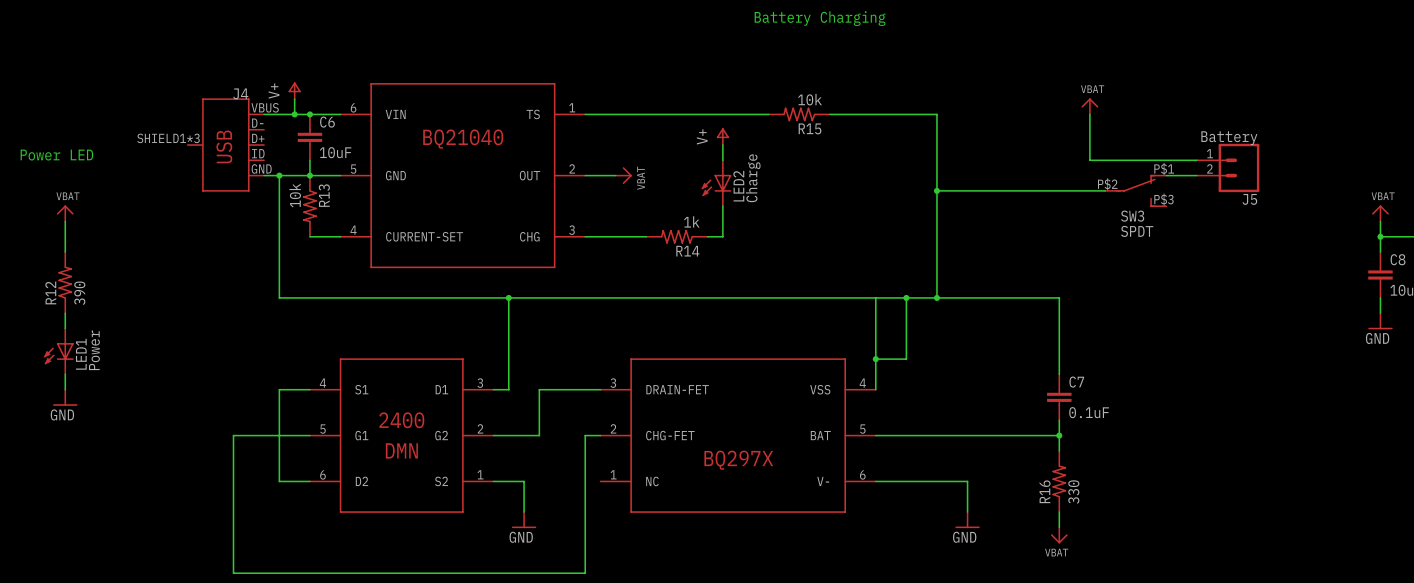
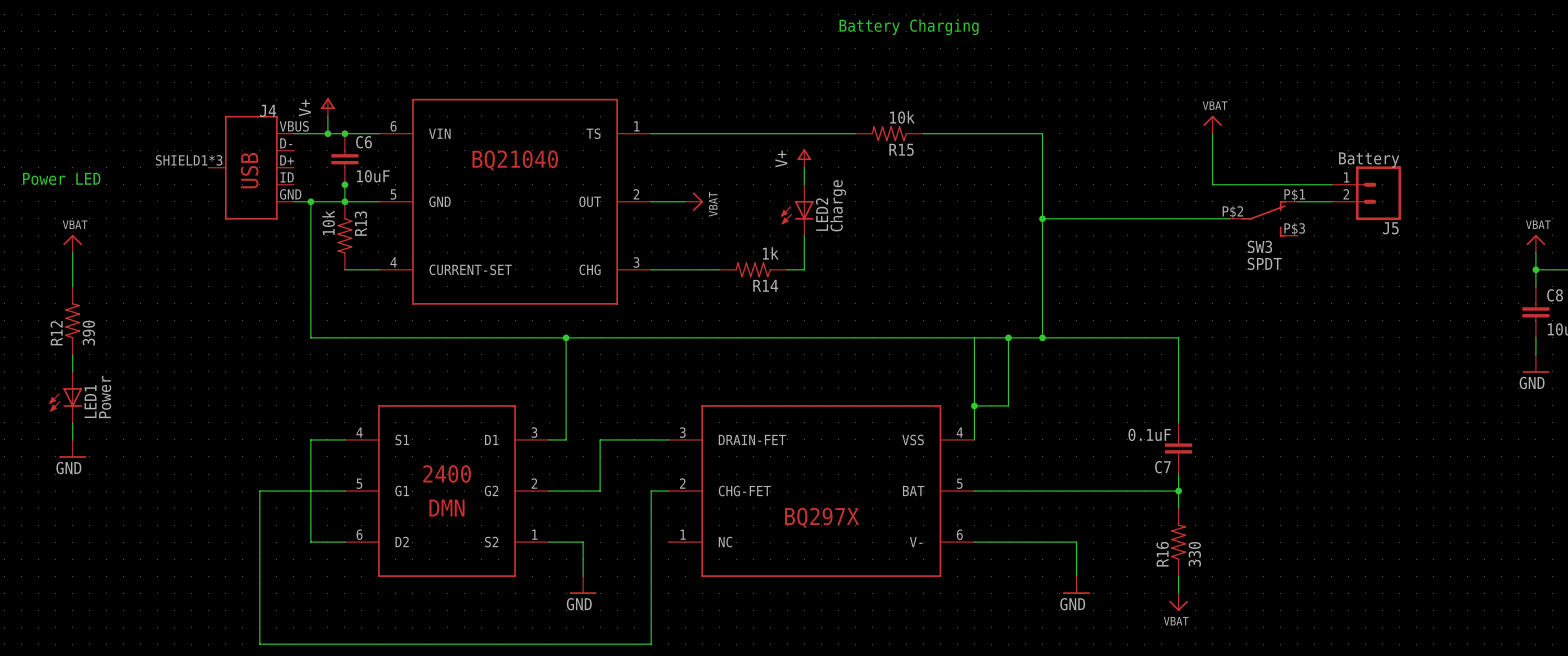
junction: none -> (344, 184)
C7 name position: C7 (1076, 382) -> C7 (1162, 467)
C7 value position: 0.1uF (1089, 412) -> 0.1uF (1149, 434)

